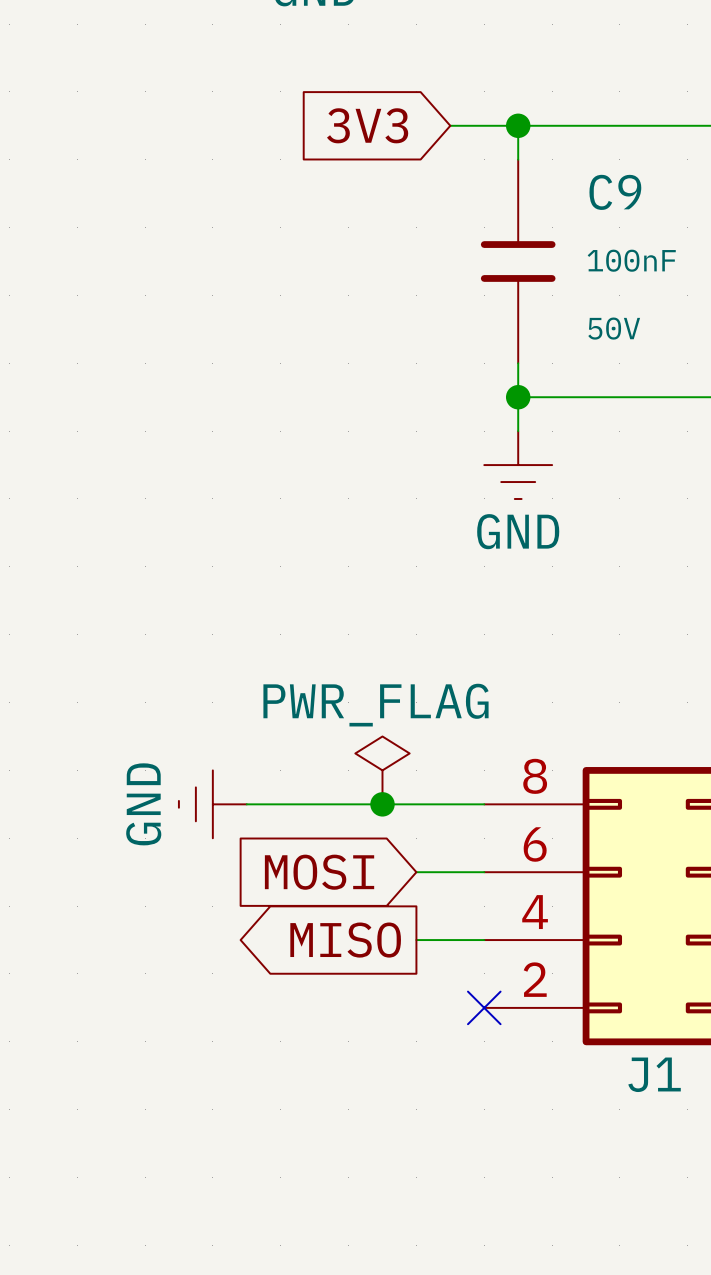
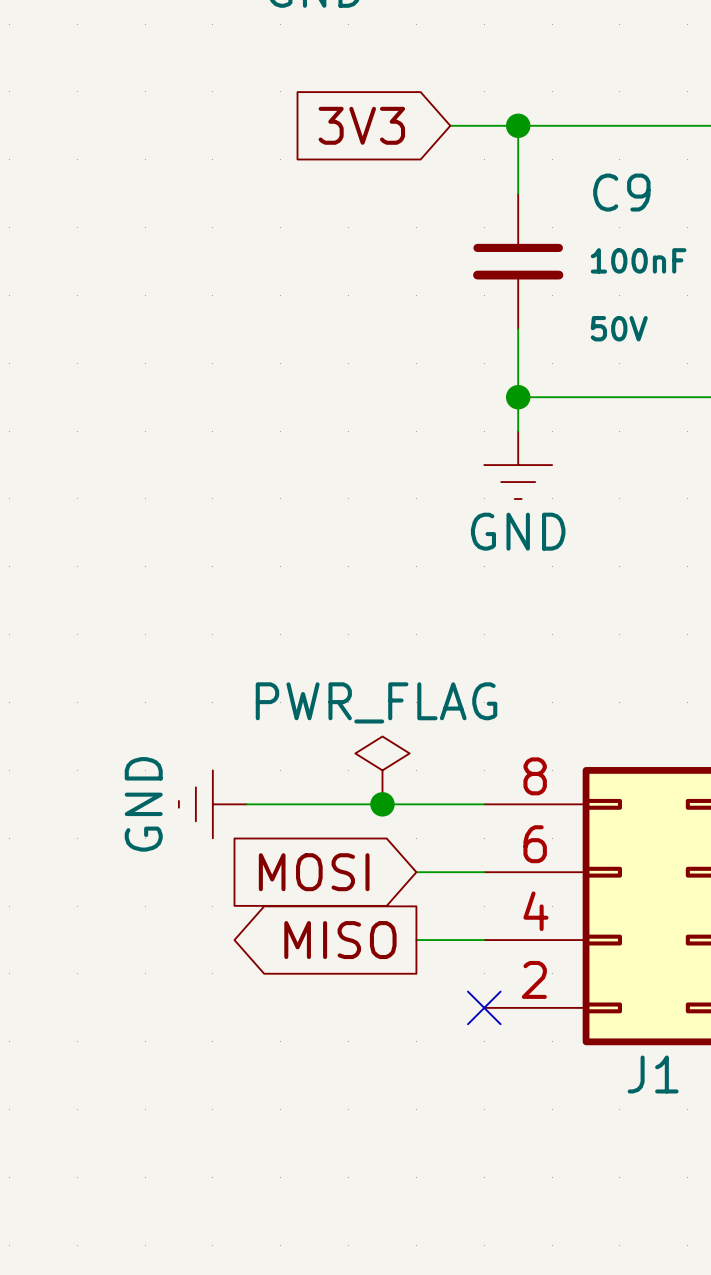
C9 symbol: [480, 159, 556, 364] -> [473, 193, 564, 330]

